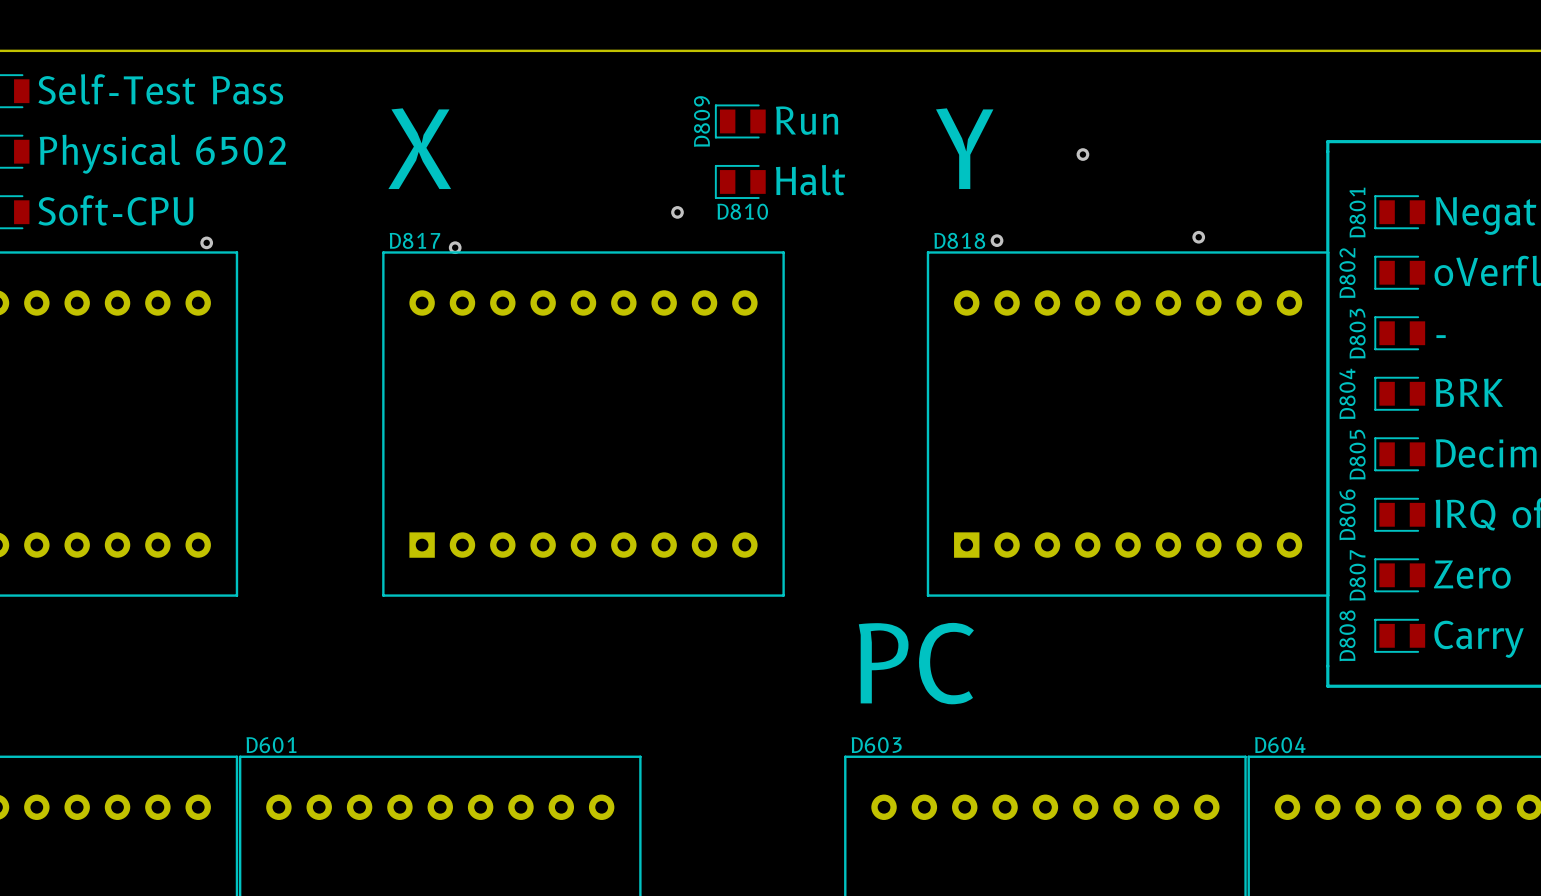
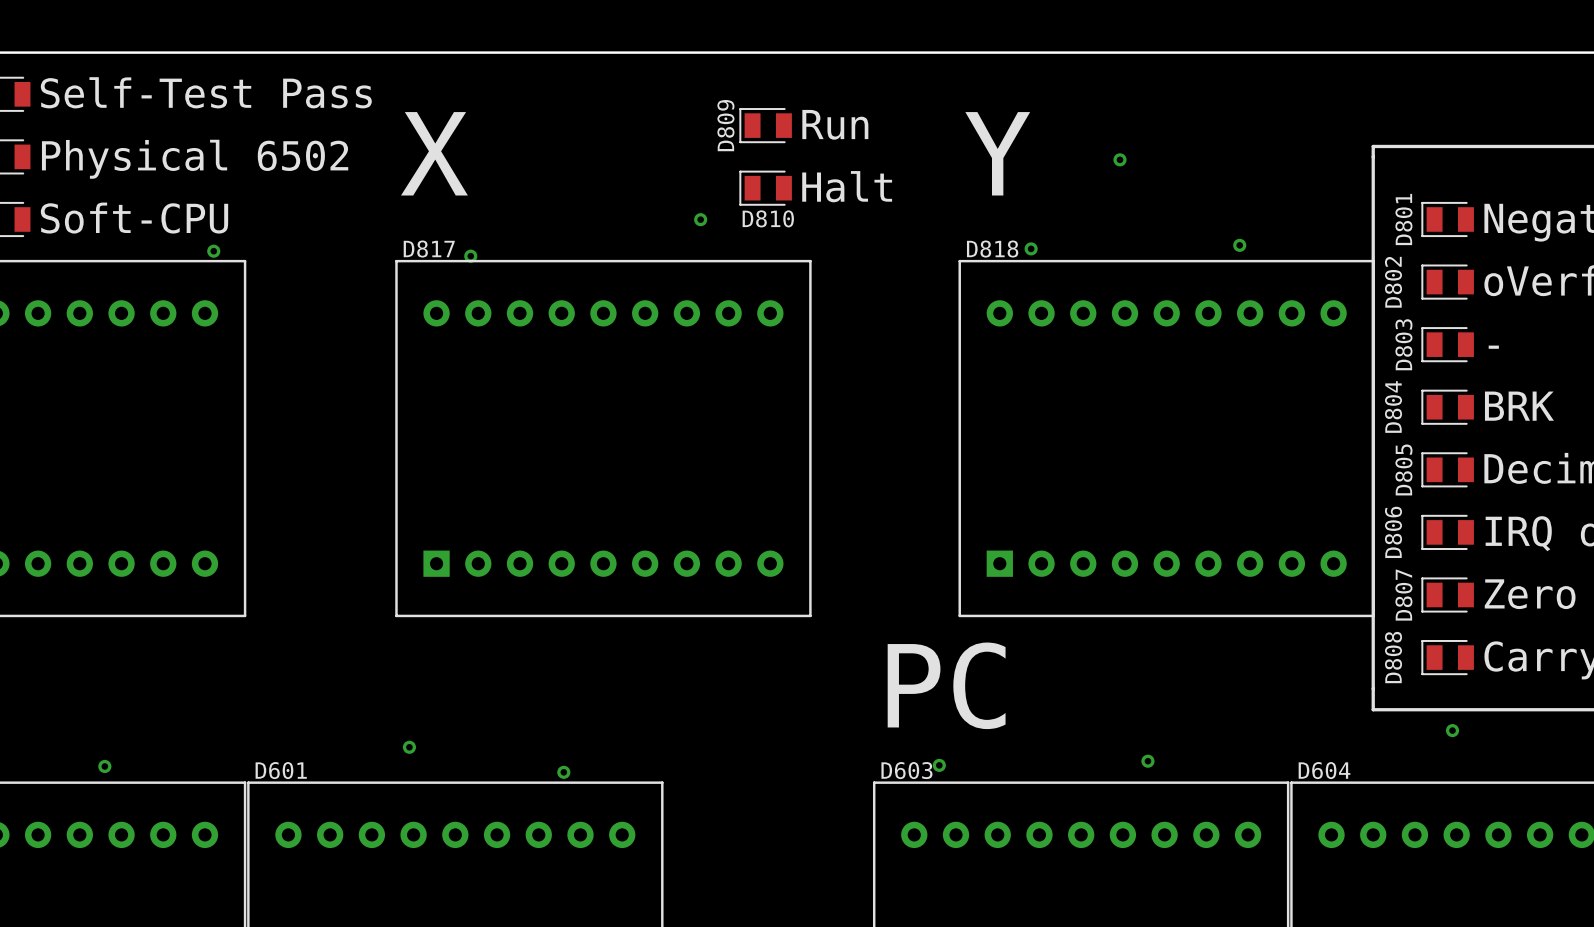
via: none -> (1452, 730)
via: none -> (409, 747)
via: none -> (1147, 761)
via: none -> (939, 765)
via: none -> (104, 766)
via: none -> (563, 772)

